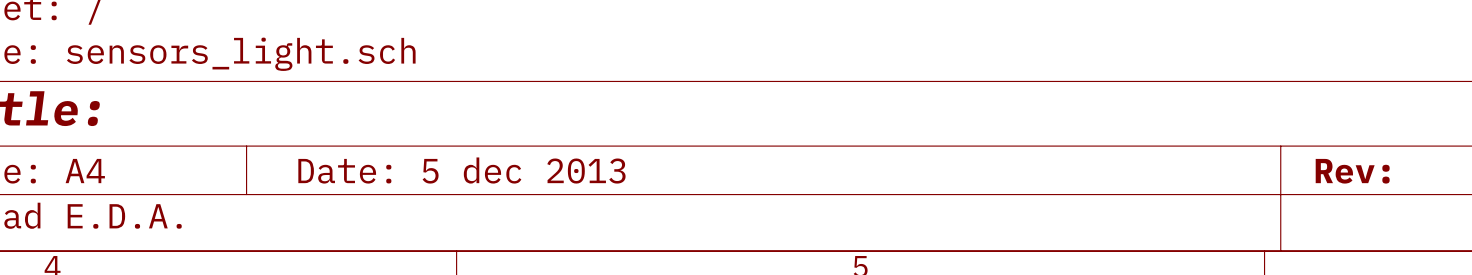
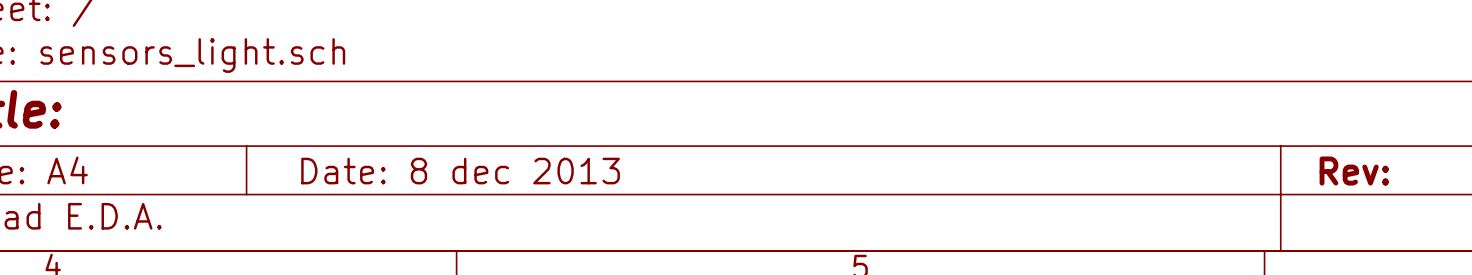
title block: Date: 5 dec 2013 (461, 170) -> Date: 8 dec 2013 (460, 171)

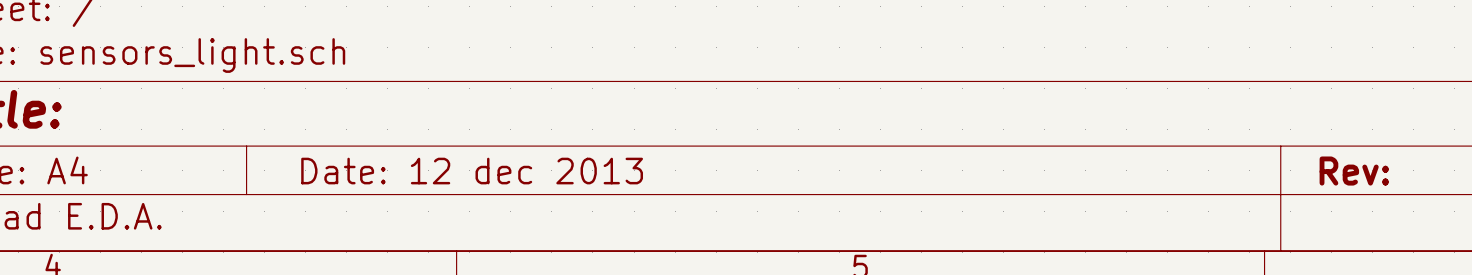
title block: Date: 8 dec 2013 (460, 171) -> Date: 12 dec 2013 (472, 171)

